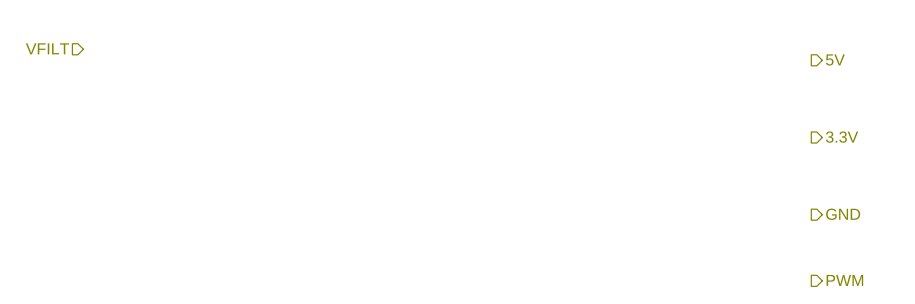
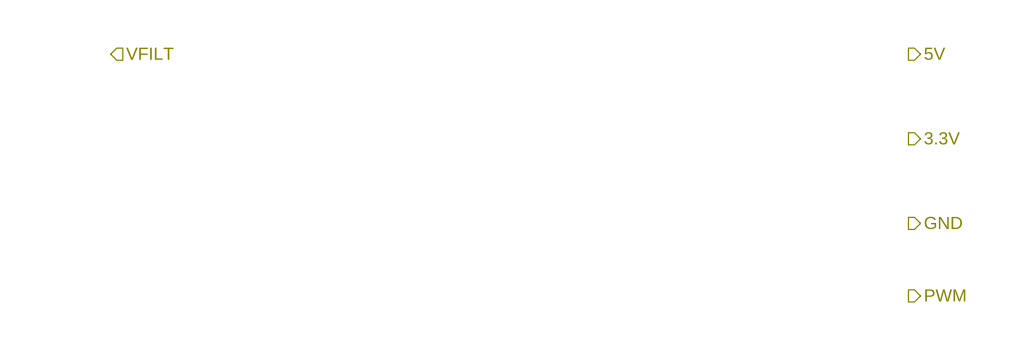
hierarchical label rotation: 0° (47, 48) -> 180° (149, 53)
hierarchical label position: VFILT (47, 48) -> VFILT (149, 53)

